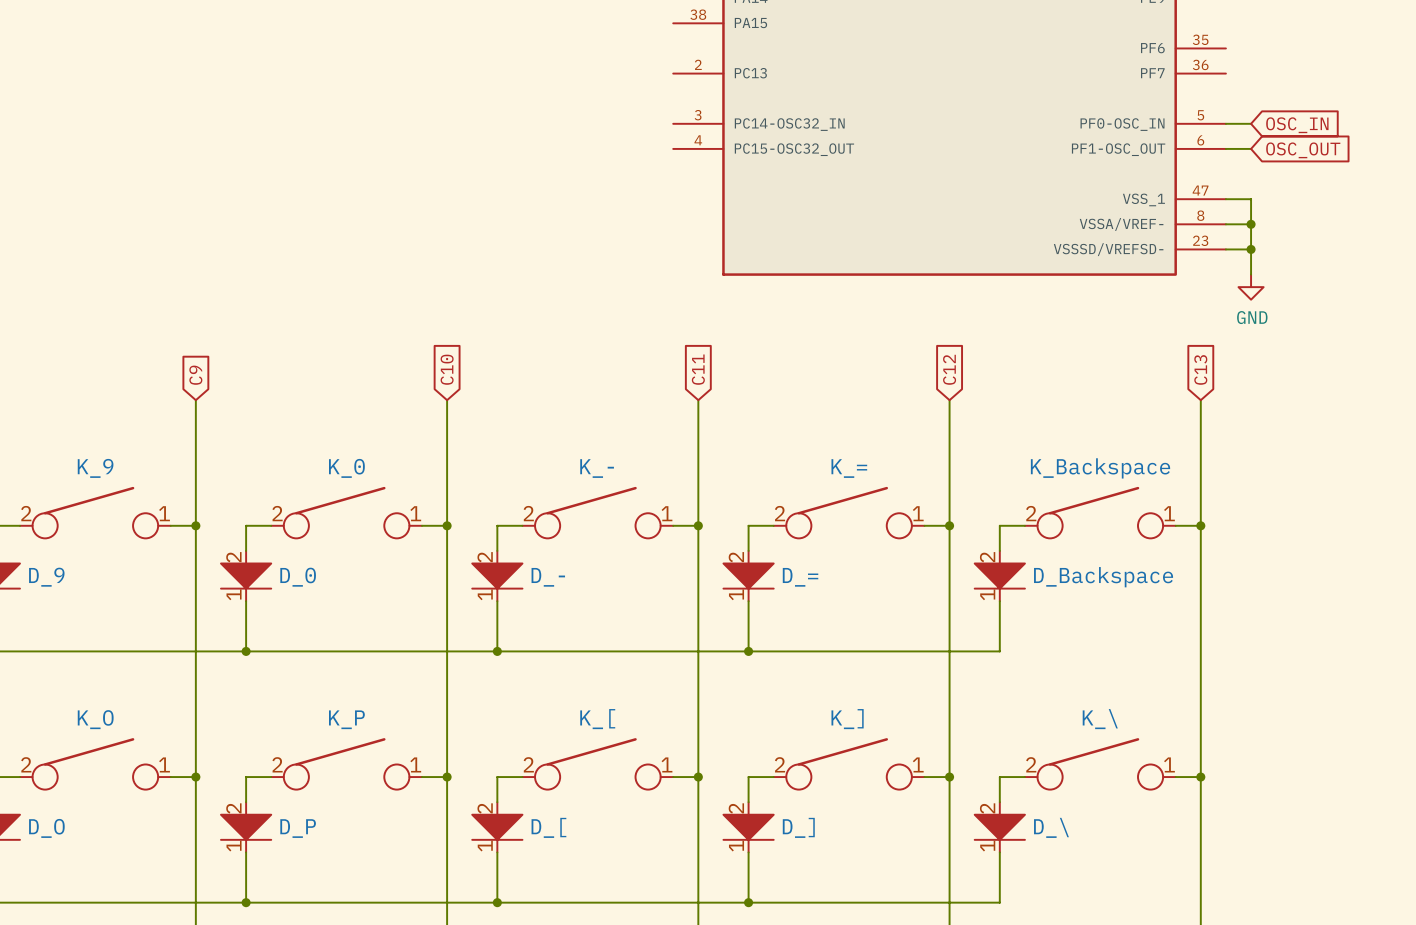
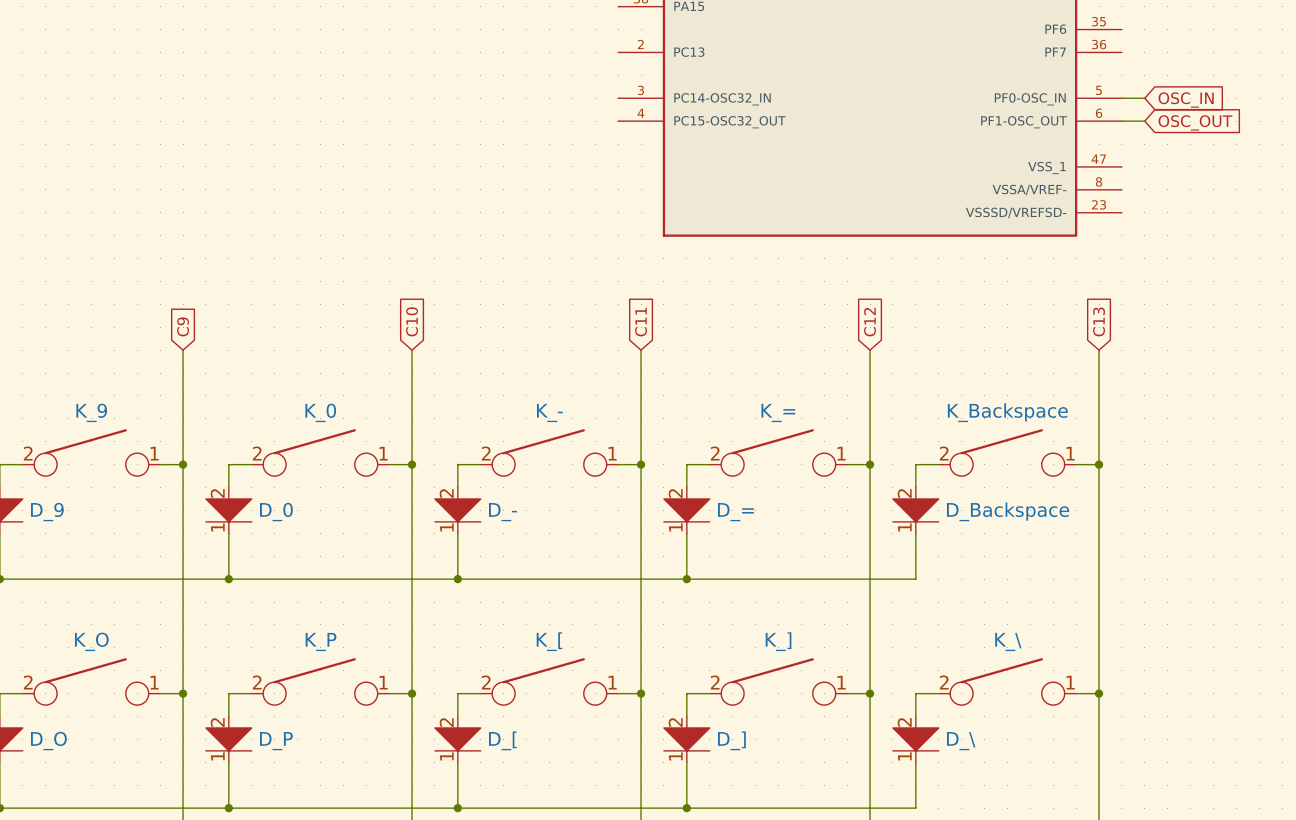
wire: (1225, 199) (1251, 199) (1251, 274) -> none
wire: (1225, 224) (1251, 224) -> none
junction: (1251, 224) -> none
wire: (1225, 249) (1251, 249) -> none
junction: (1251, 249) -> none
power symbol: GND (1251, 287) -> none

